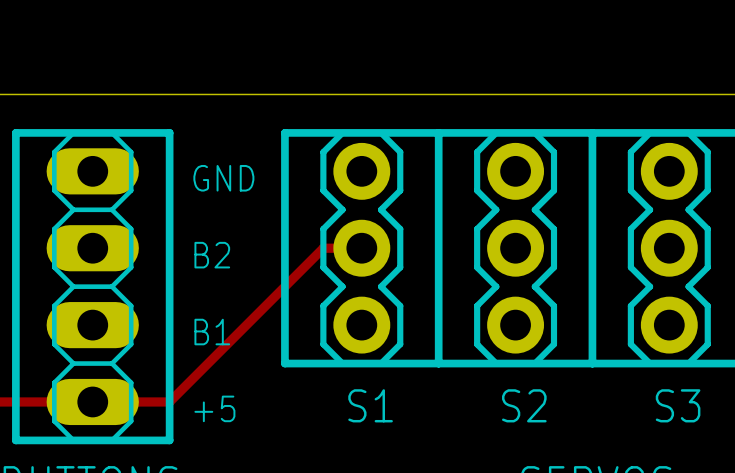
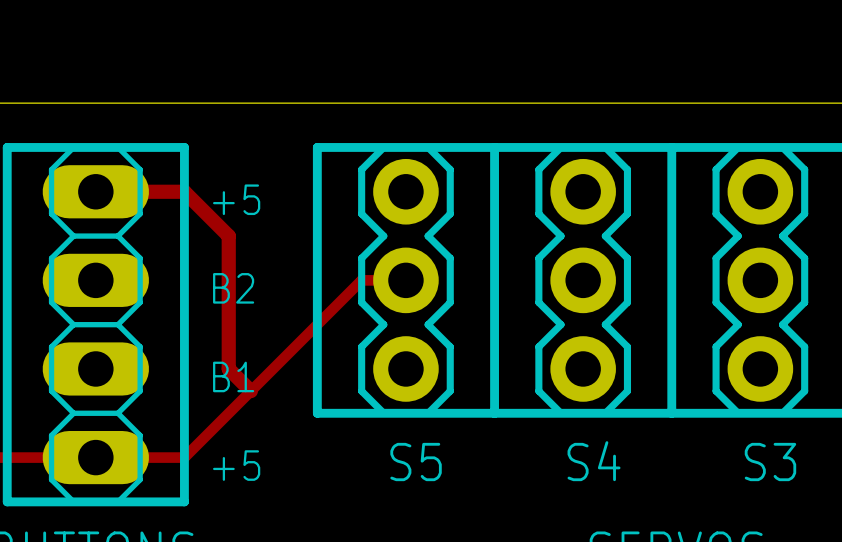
track: none -> (95, 191) (184, 191) (228, 236) (228, 368) (250, 391)
text: GND (223, 178) -> +5 (236, 199)
text: S1 (370, 405) -> S5 (416, 462)
text: S2 (524, 405) -> S4 (594, 461)

